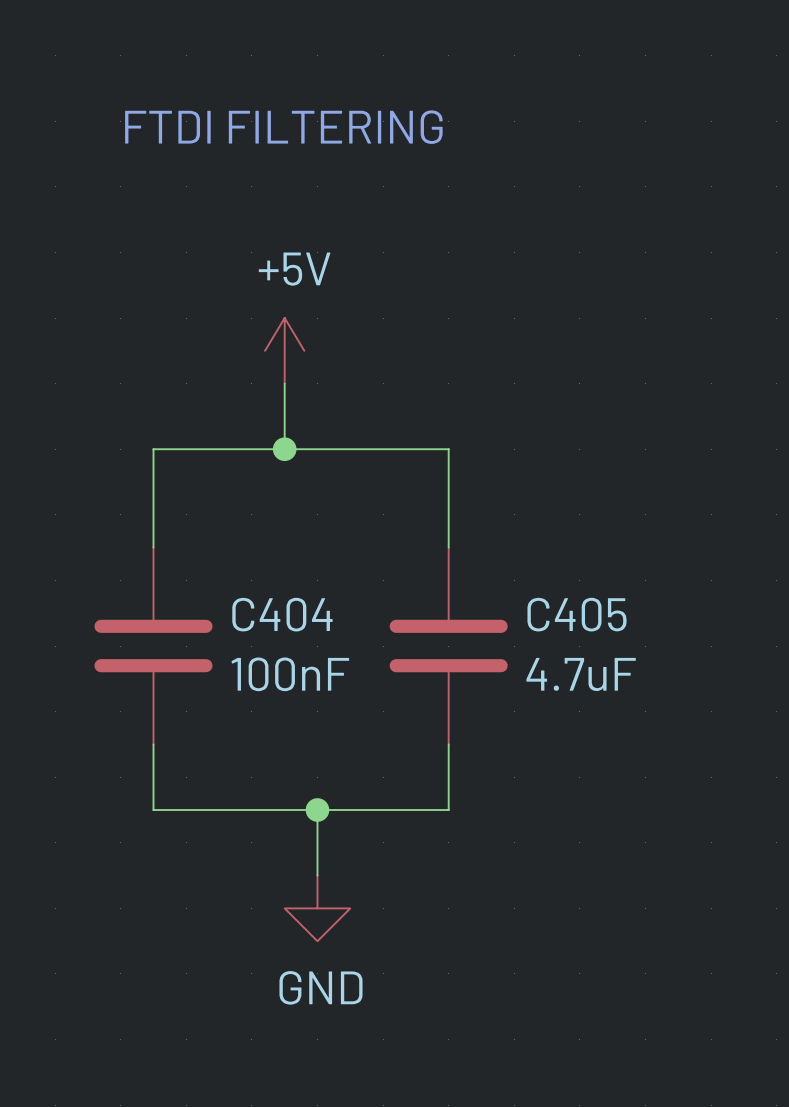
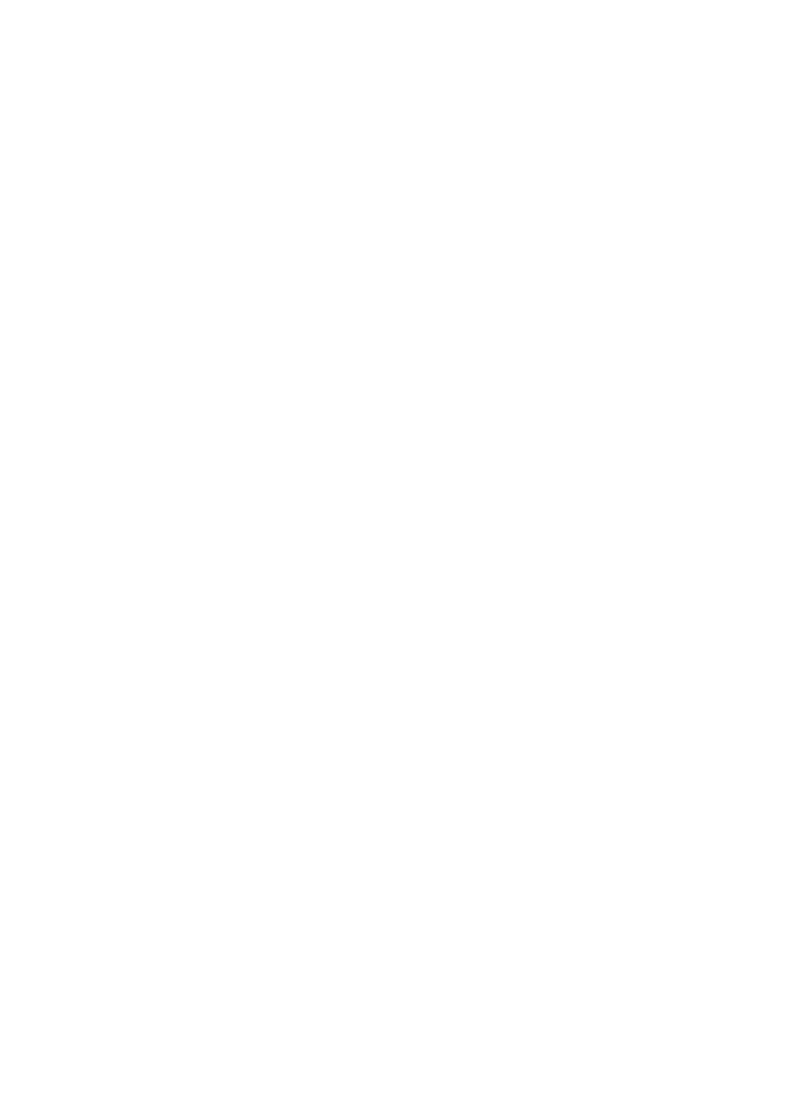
text: FTDI FILTERING (283, 127) -> none
power symbol: +5V (284, 350) -> none
wire: (284, 383) (284, 449) -> none
junction: (284, 449) -> none
wire: (153, 547) (153, 449) (448, 449) (448, 547) -> none
C404: 100nF (153, 646) -> none
C405: 4.7uF (448, 646) -> none
wire: (153, 744) (153, 810) (448, 810) (448, 744) -> none
wire: (317, 810) (317, 875) -> none
junction: (317, 810) -> none
power symbol: GND (317, 908) -> none

